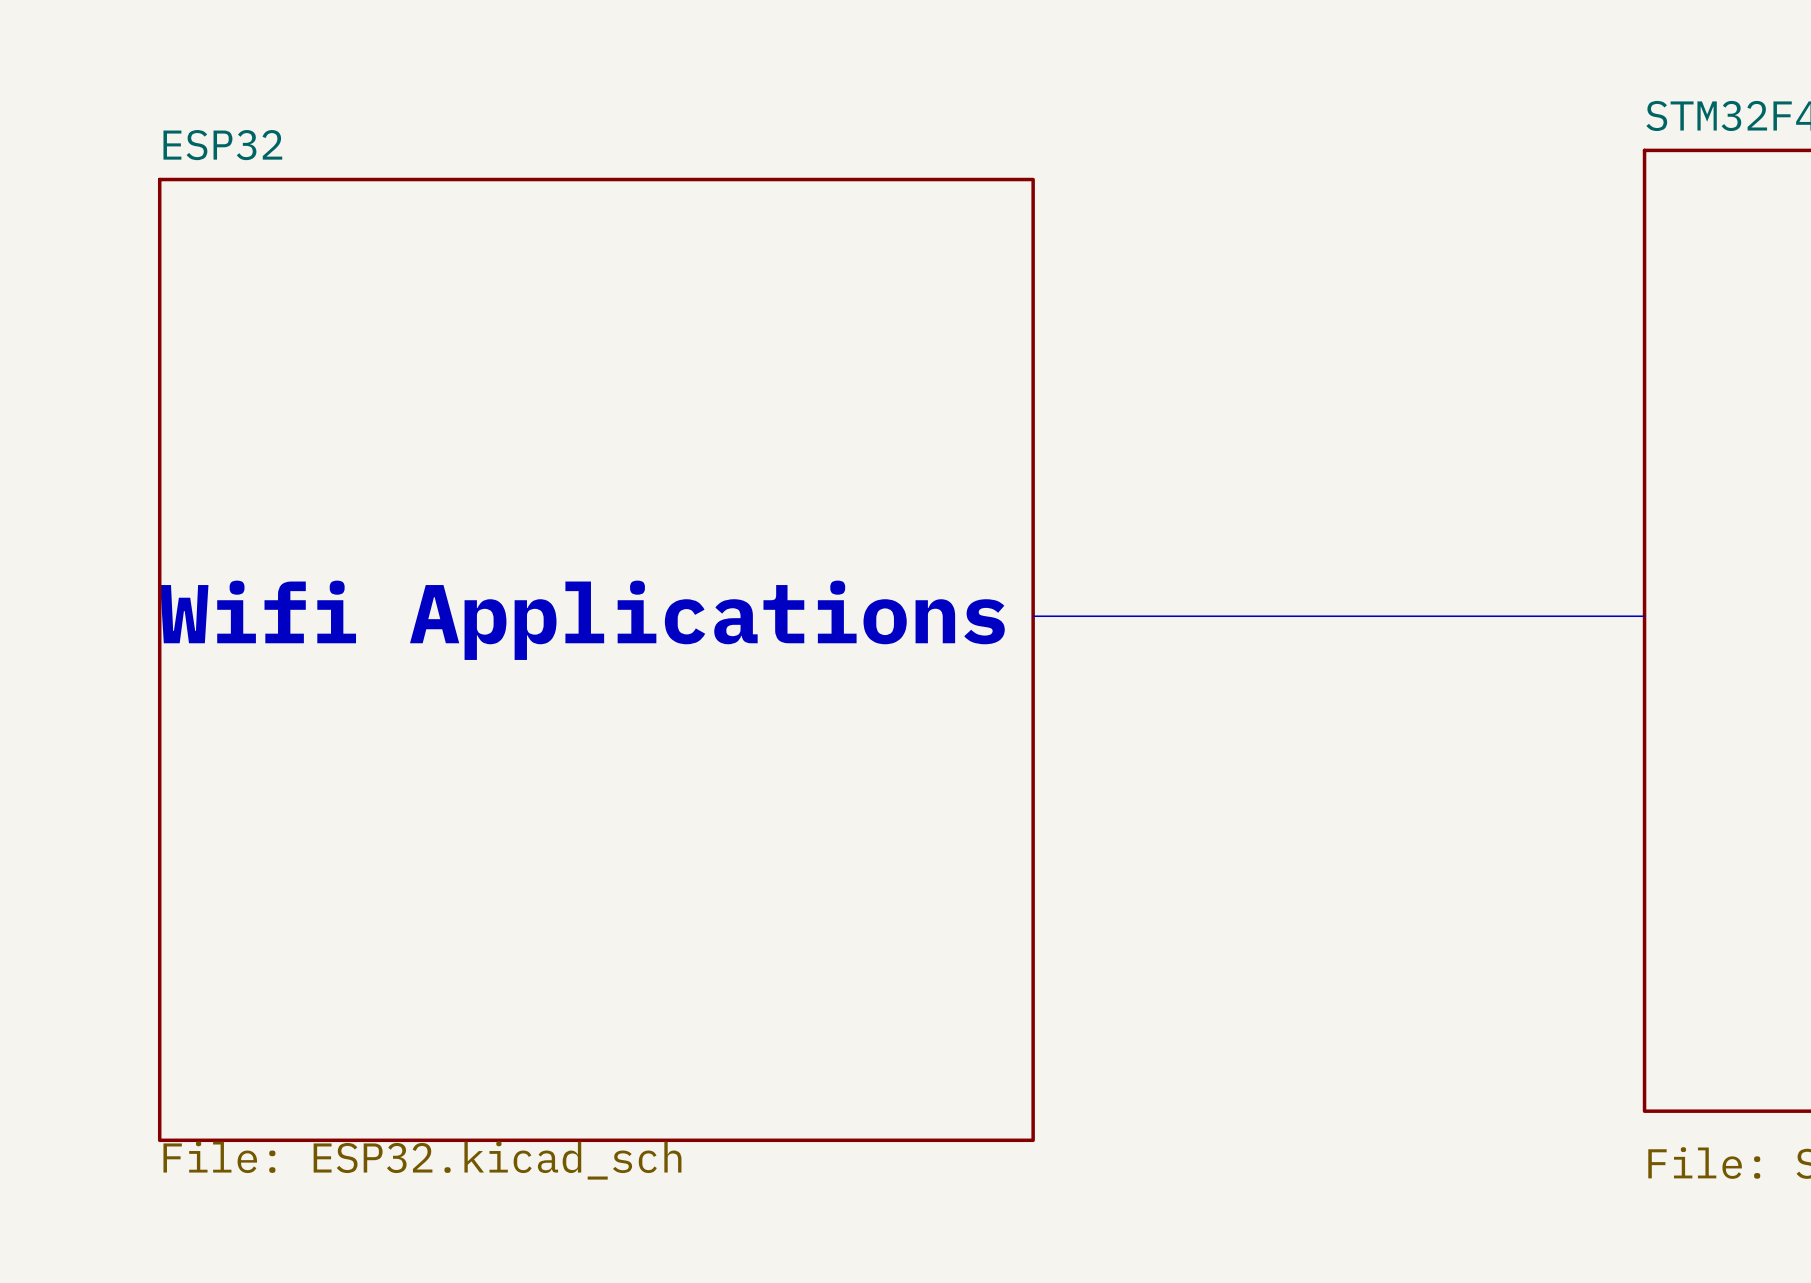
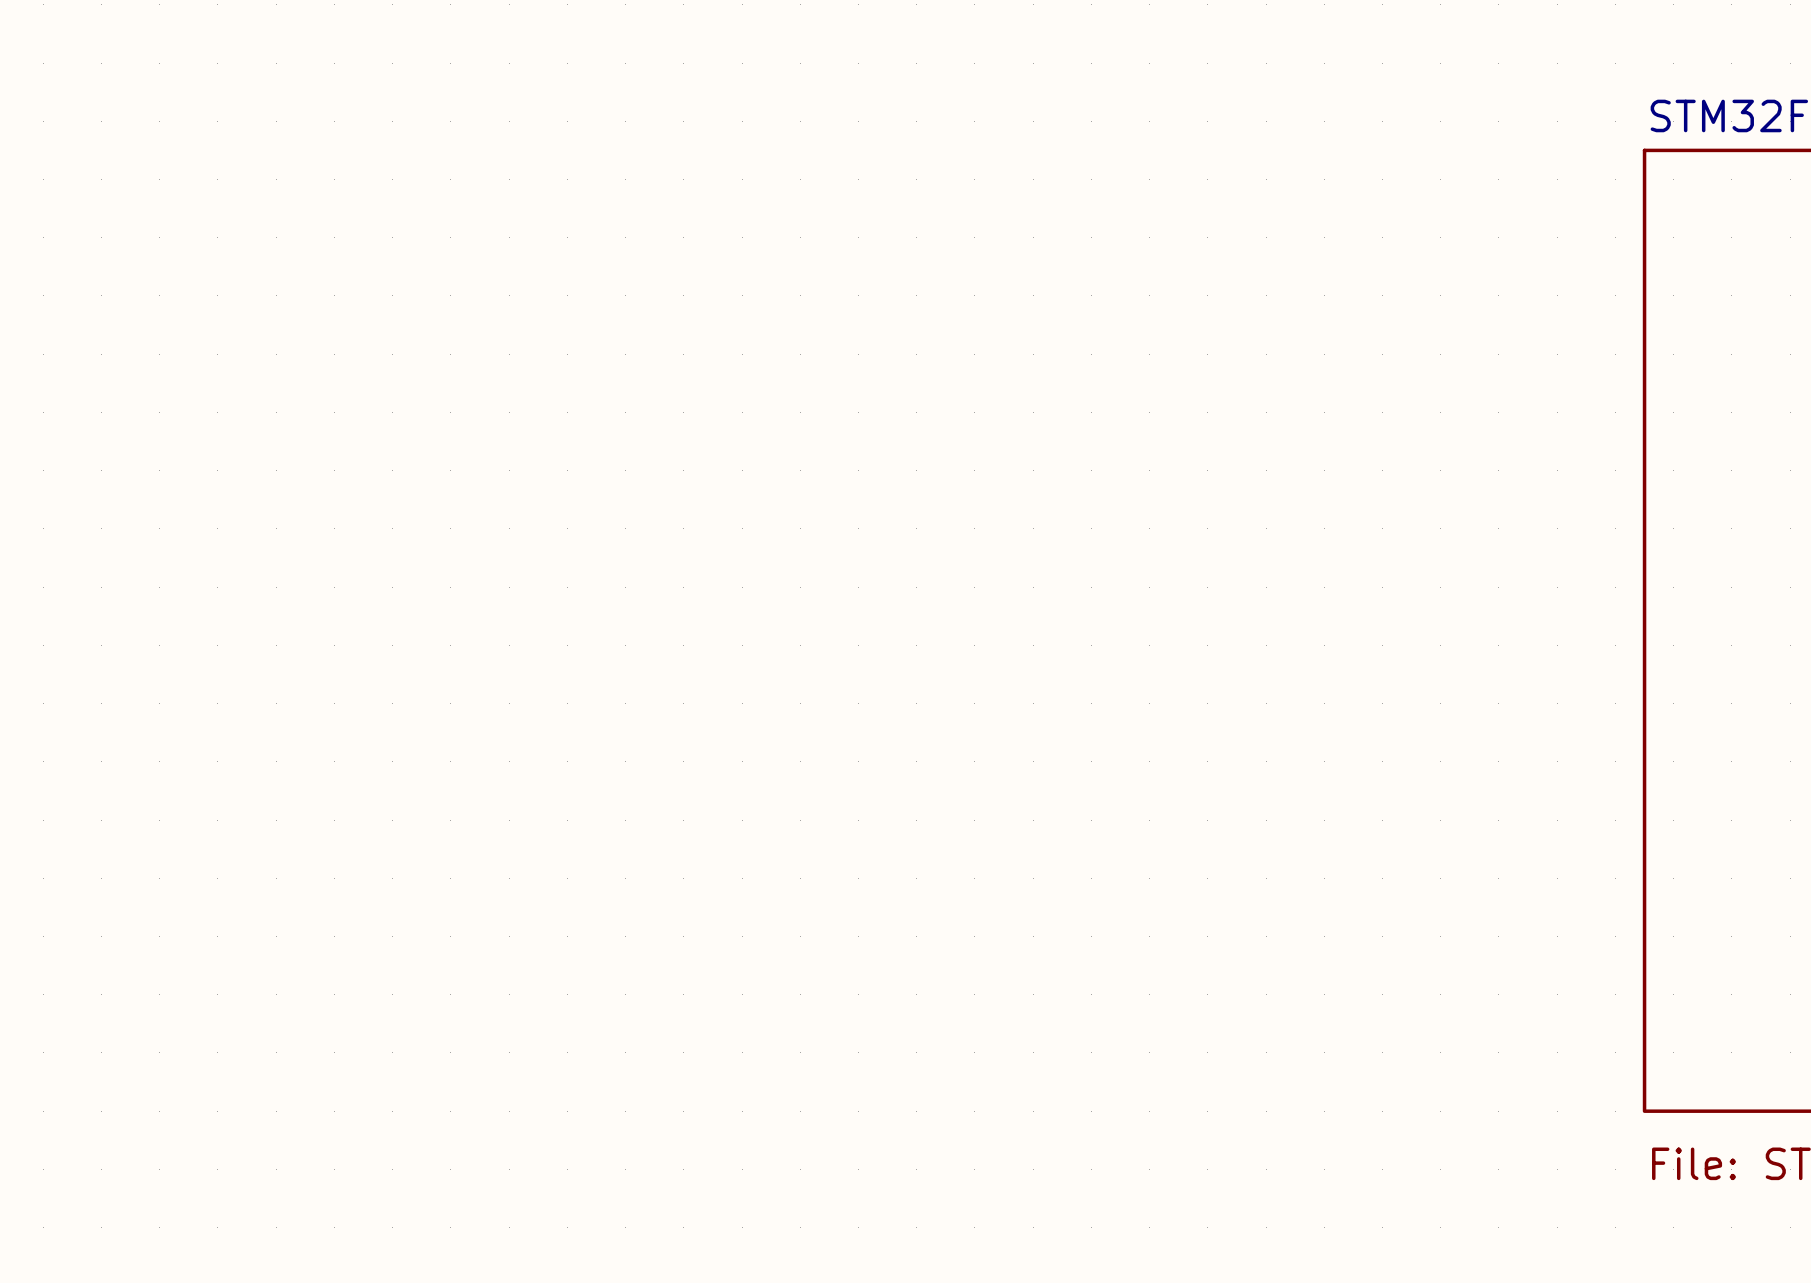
bus: (1033, 616) (1644, 616) -> none
text: Wifi Applications (582, 620) -> none
sheet ESP32: File: ESP32.kicad_sch (596, 659) -> none

